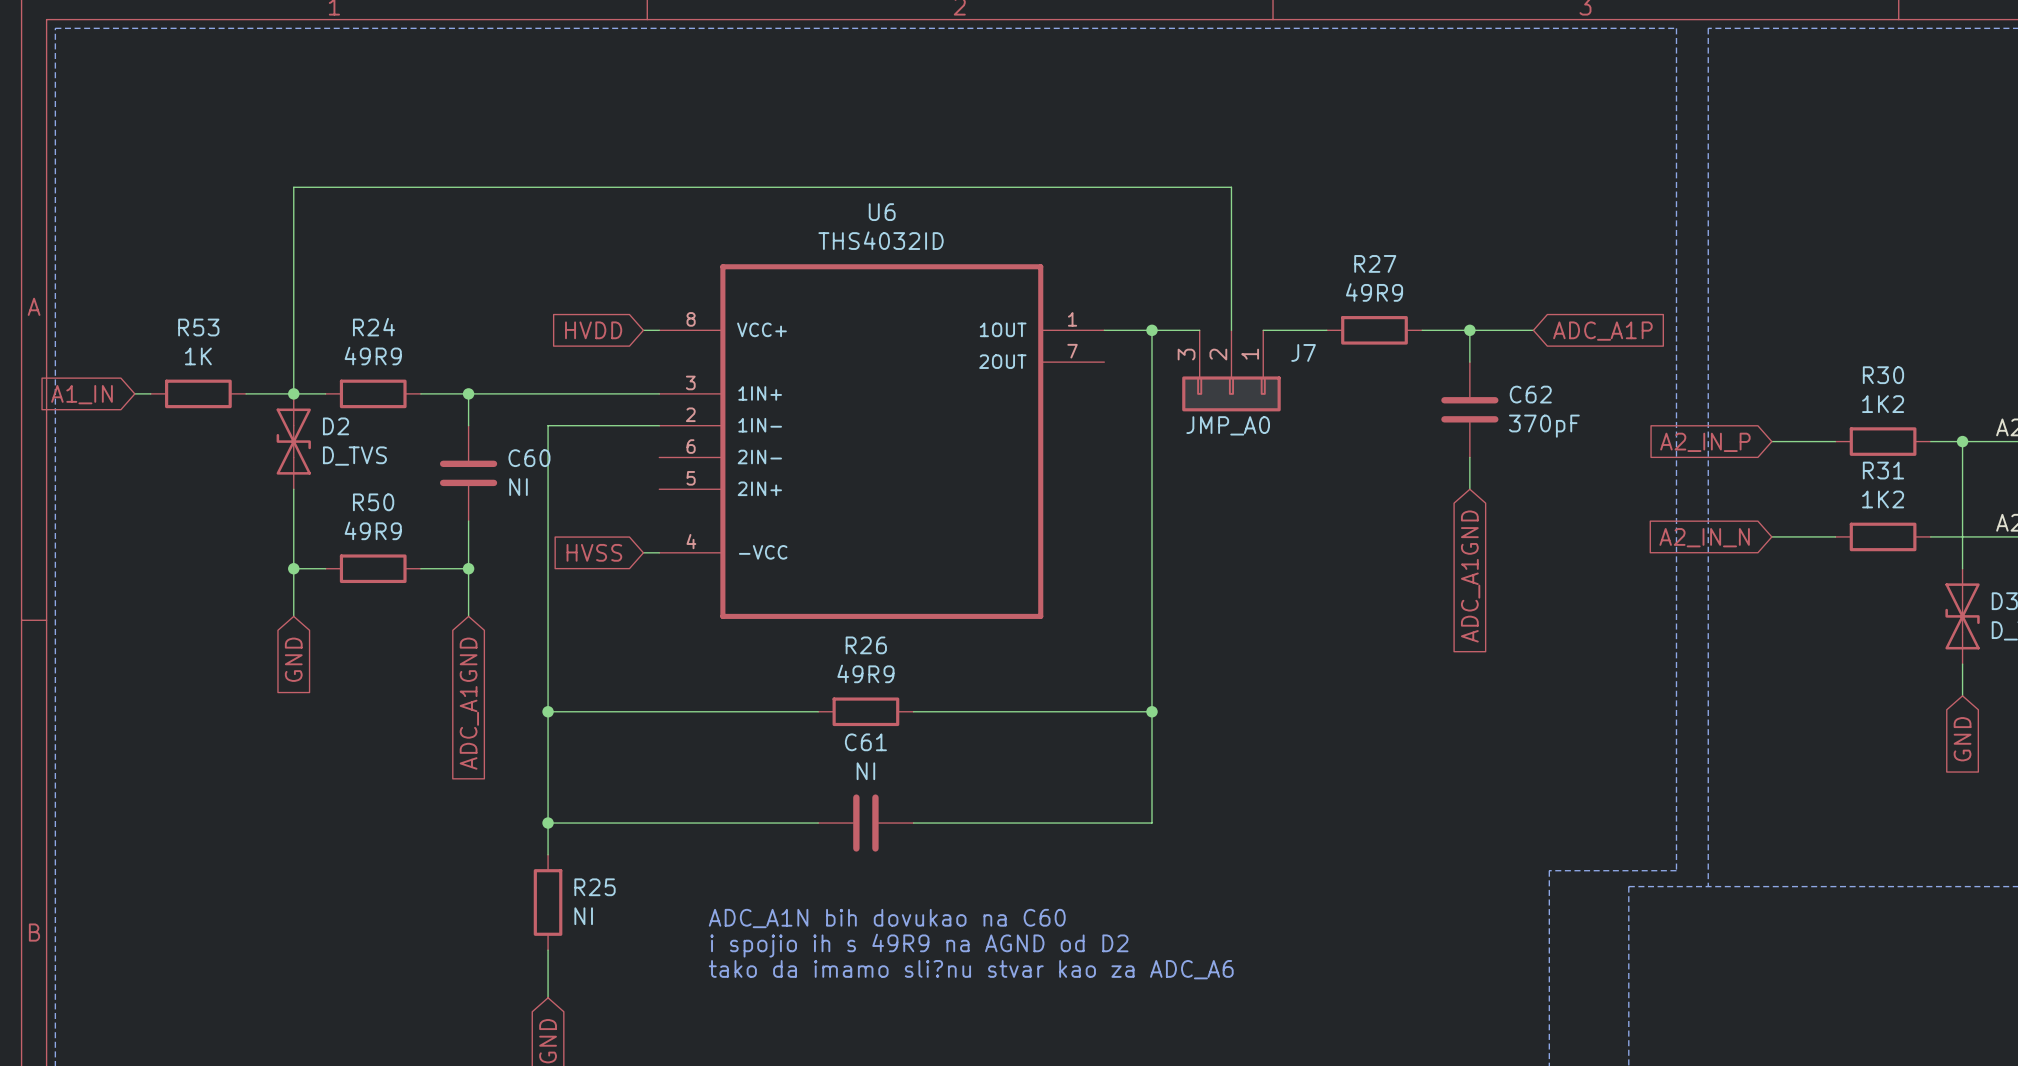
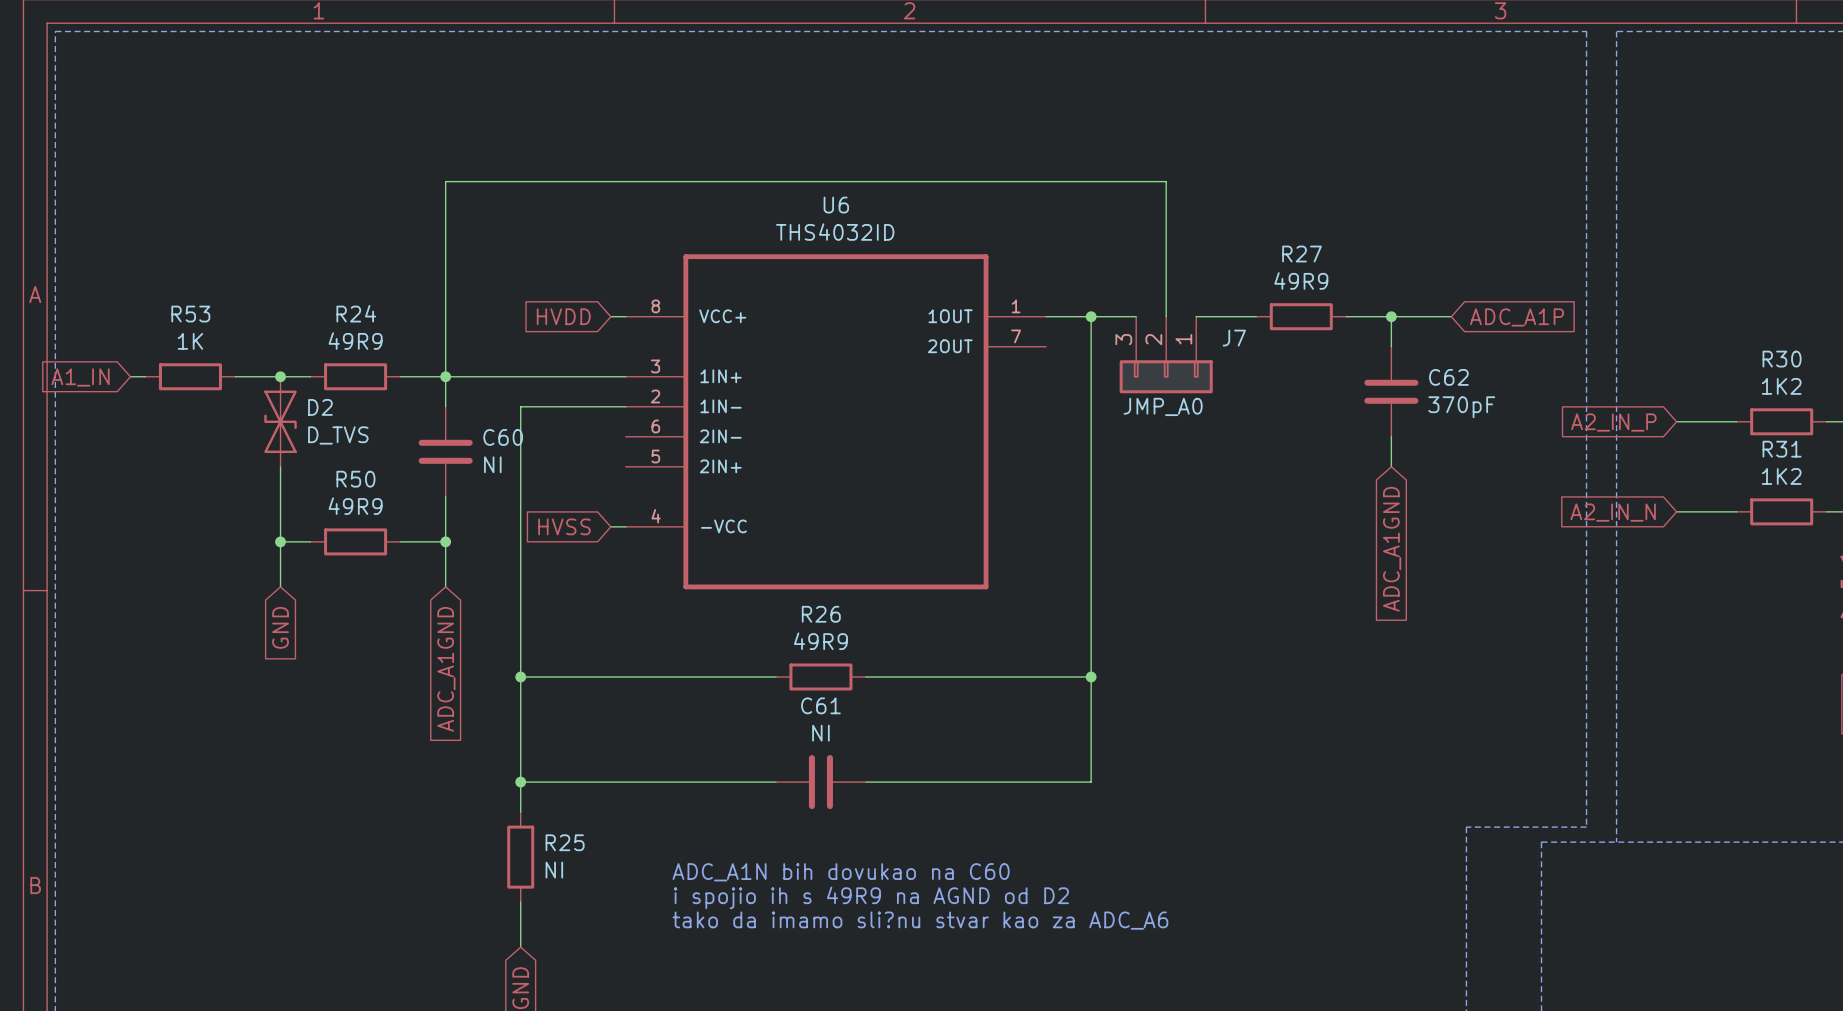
wire: (468, 187) (293, 187) (293, 393) -> (445, 181) (445, 376)

